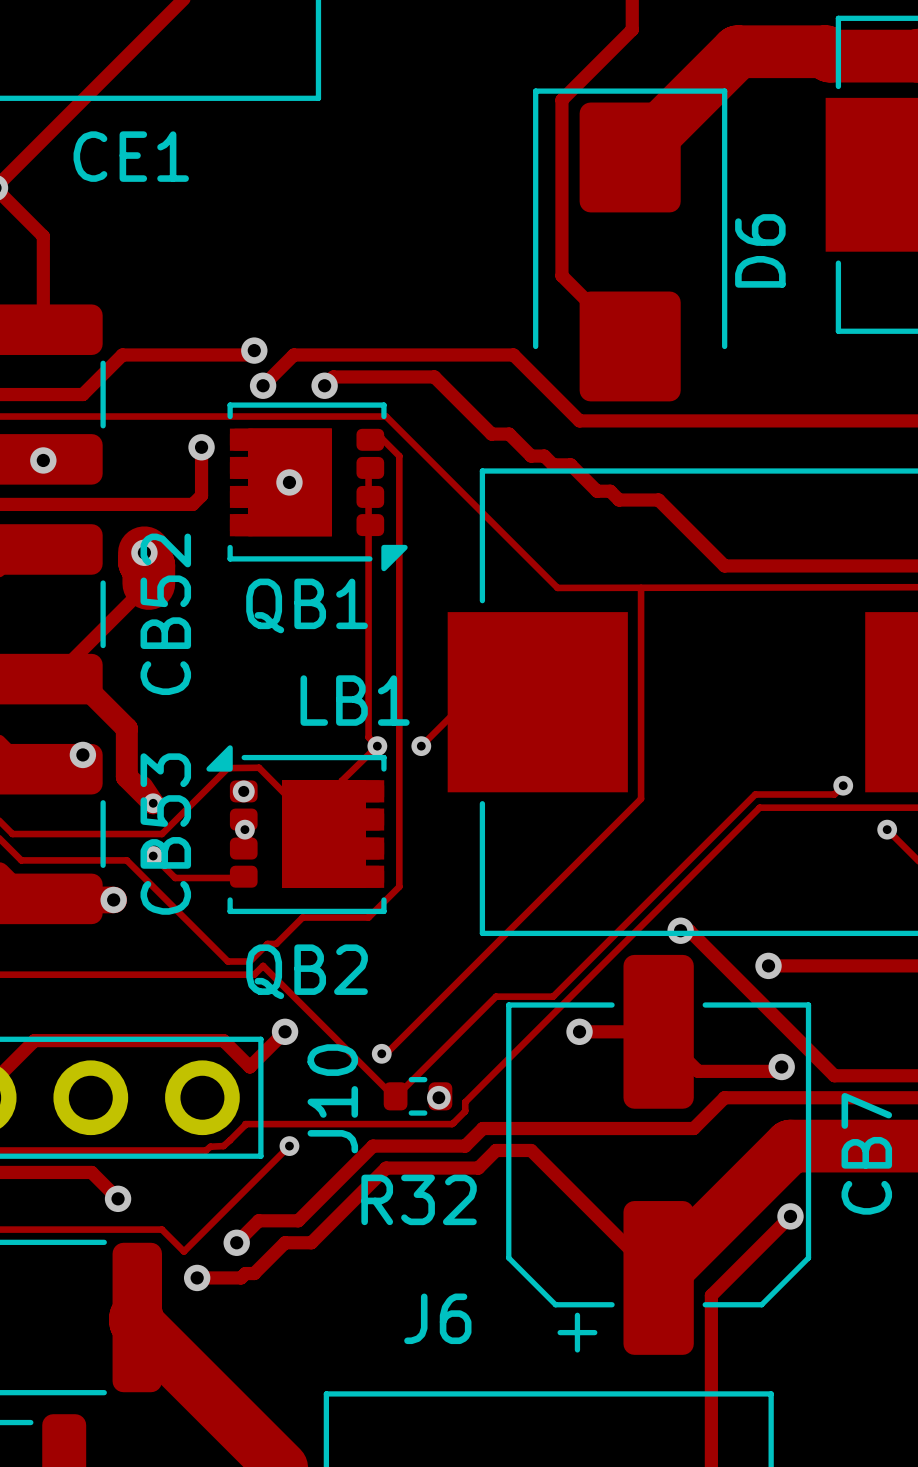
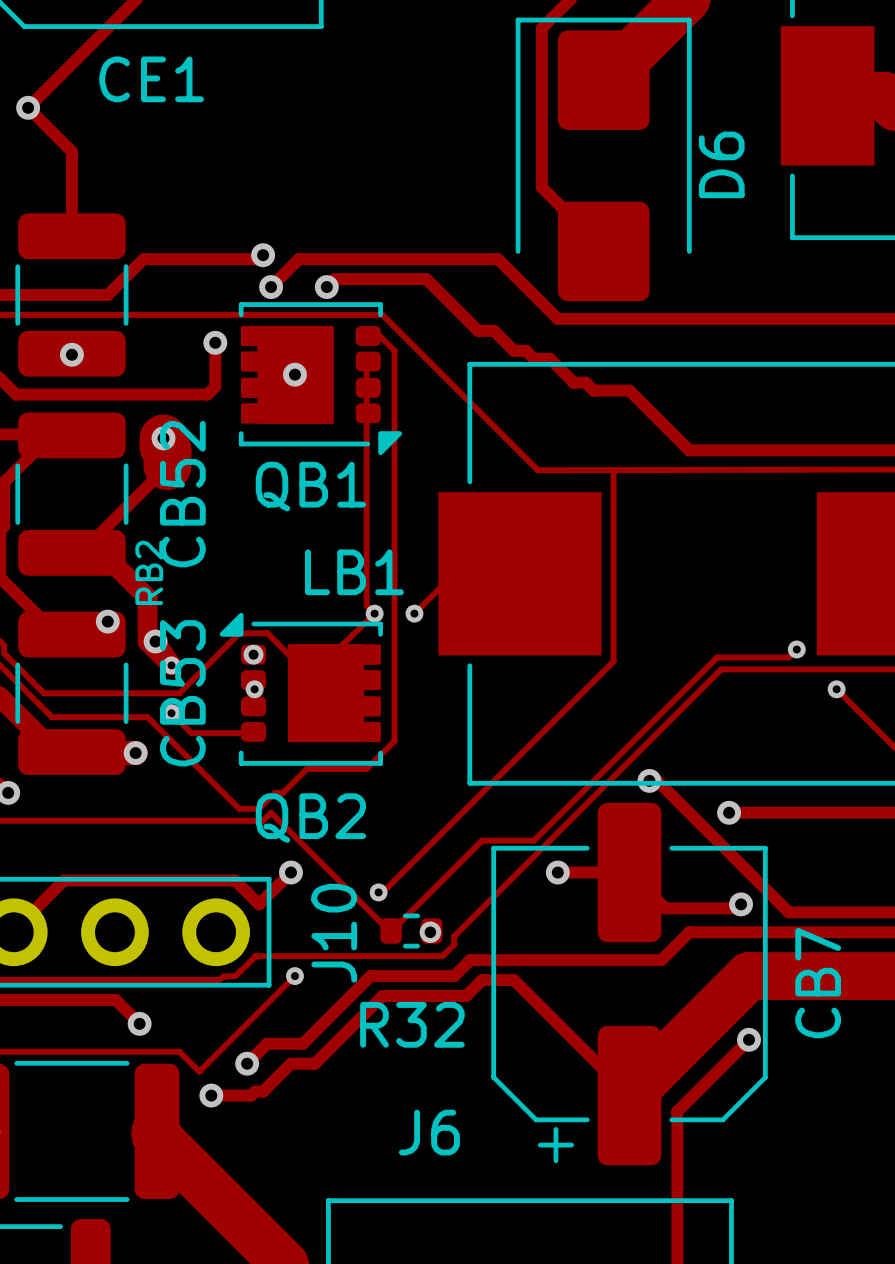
RB2 name: none -> RB2 (149, 572)
via: none -> (155, 641)

